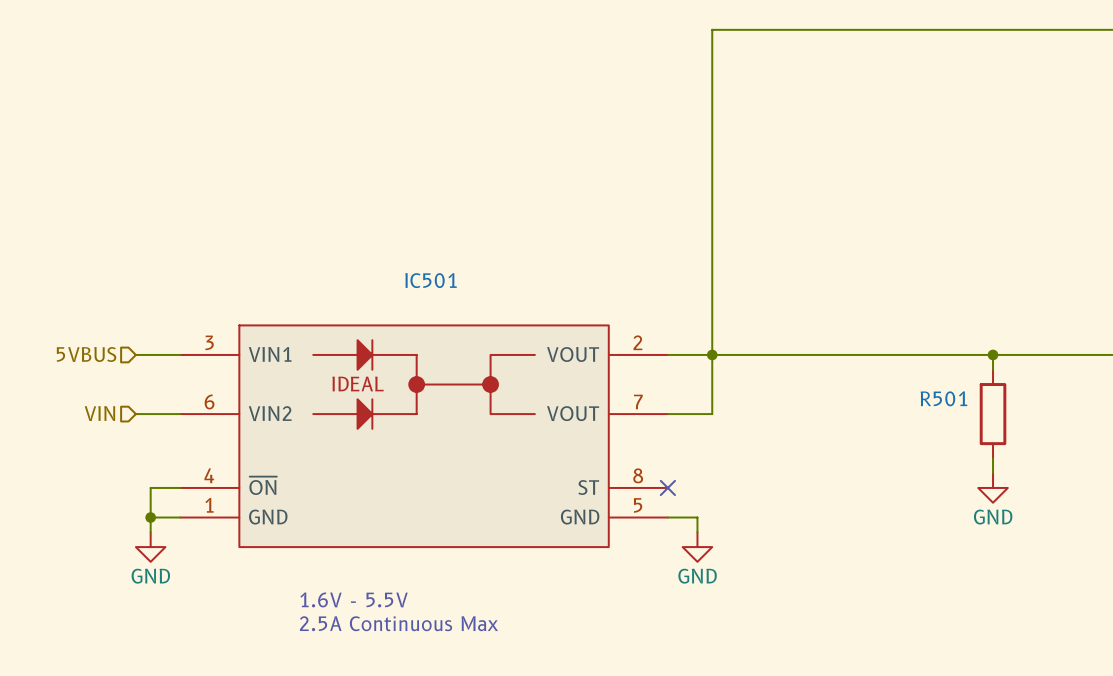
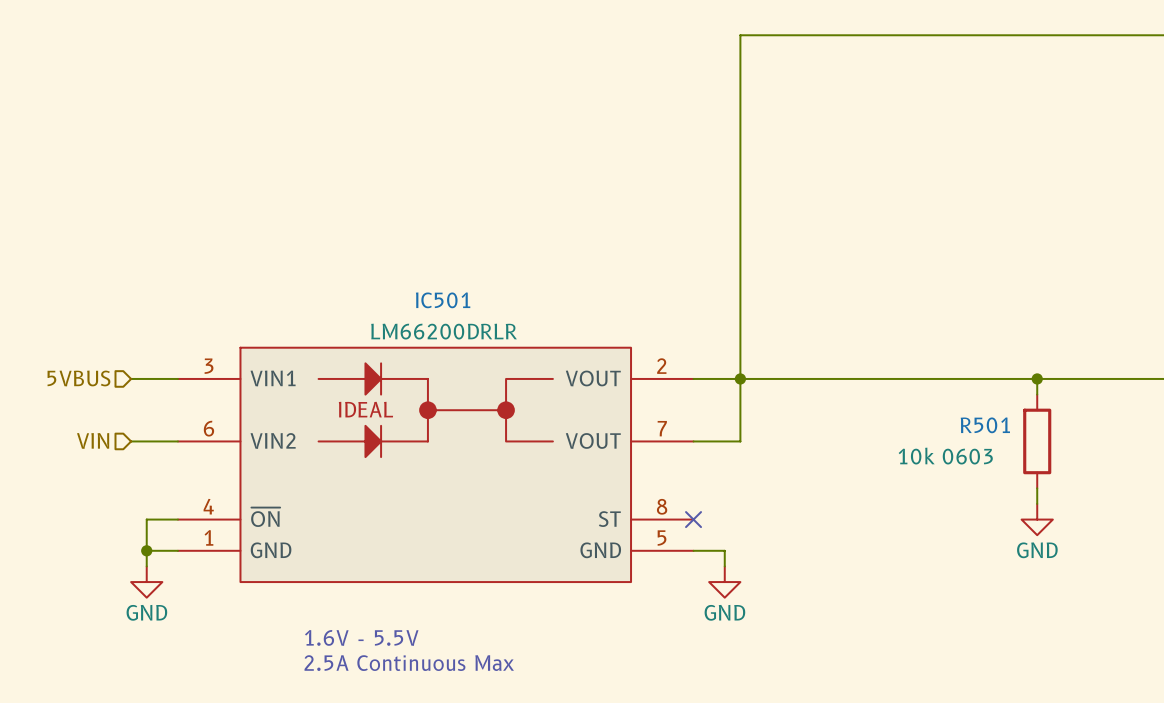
IC501 value: none -> LM66200DRLR (444, 331)
R501 value: none -> 10k 0603 (945, 456)

